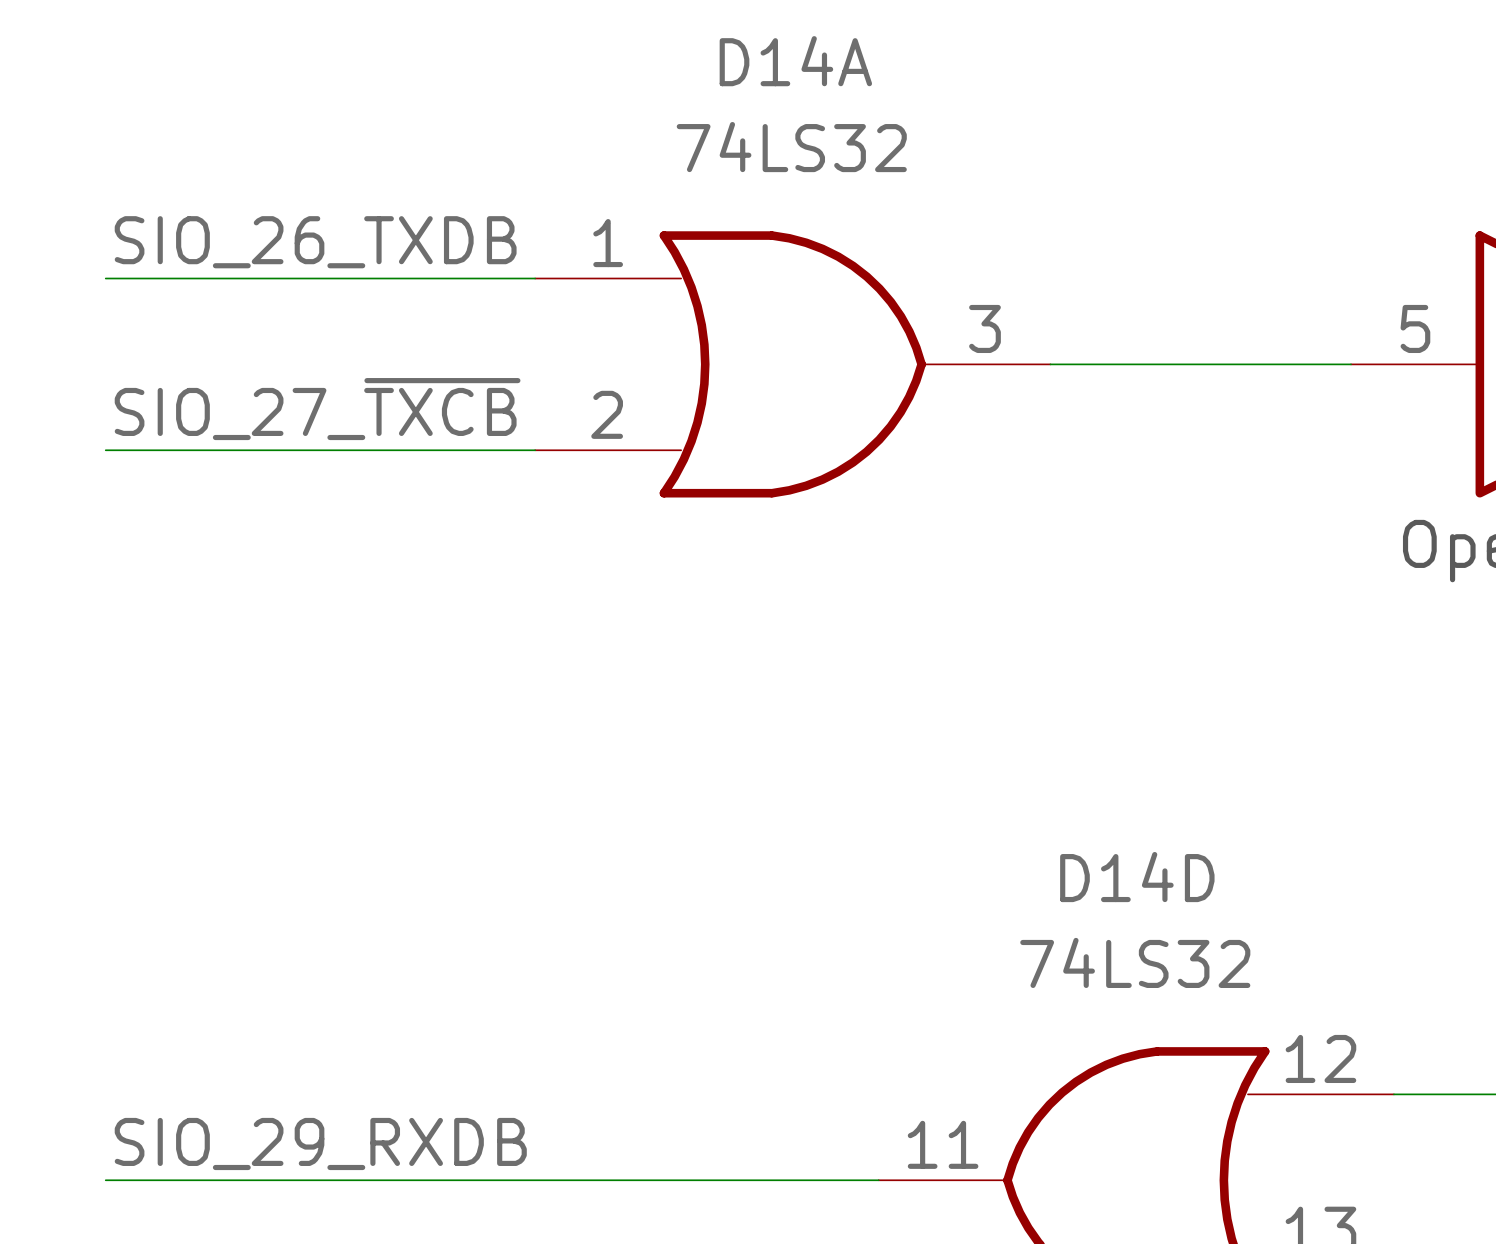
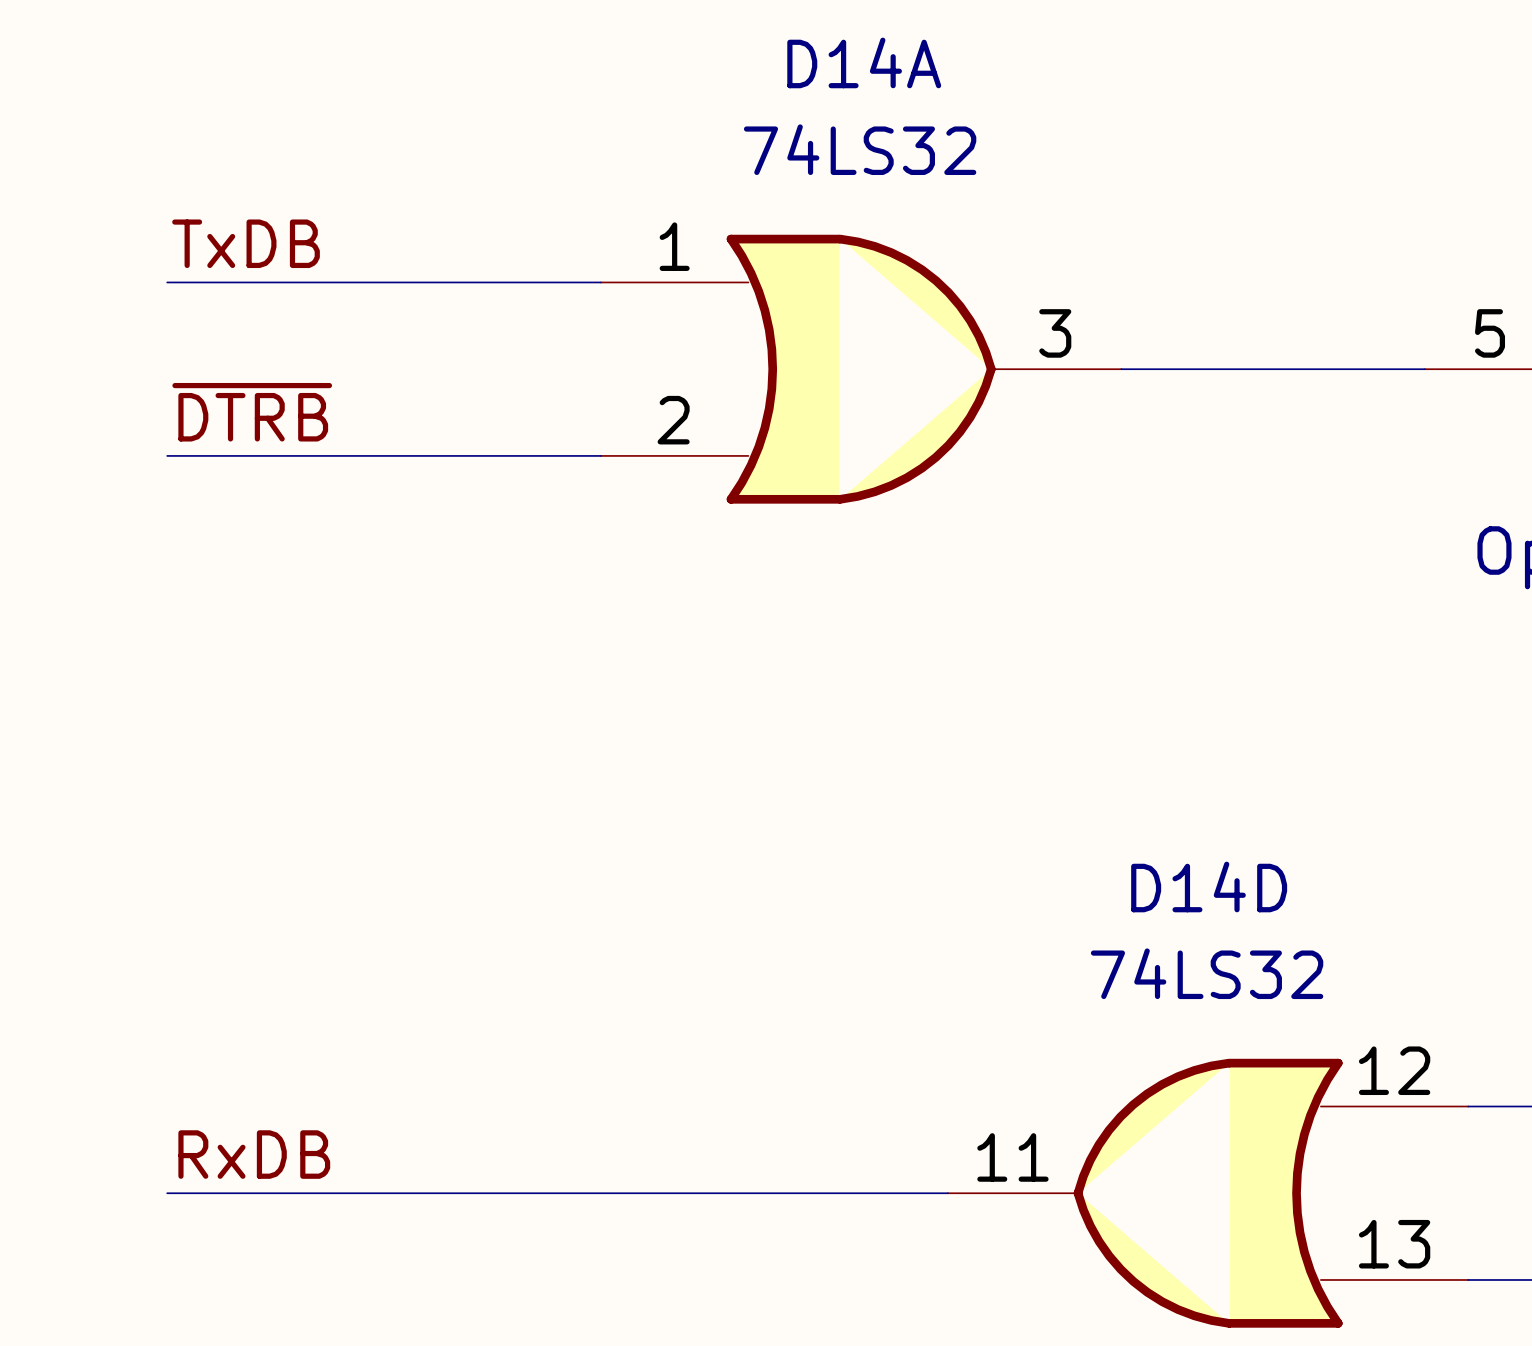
label: SIO_26_TXDB (315, 242) -> TxDB (246, 243)
label: SIO_27_~{TXCB} (317, 409) -> ~{DTRB} (252, 412)
label: SIO_29_RXDB (320, 1143) -> RxDB (254, 1154)

